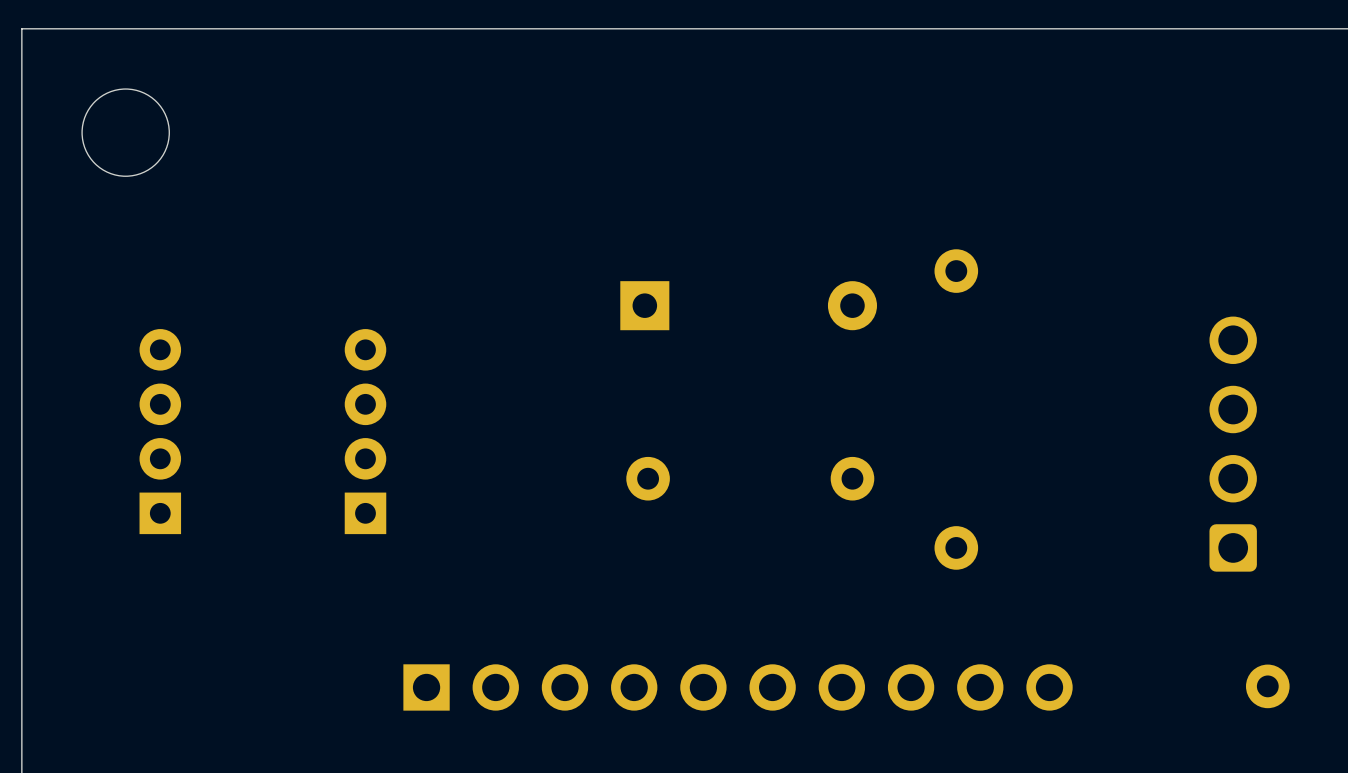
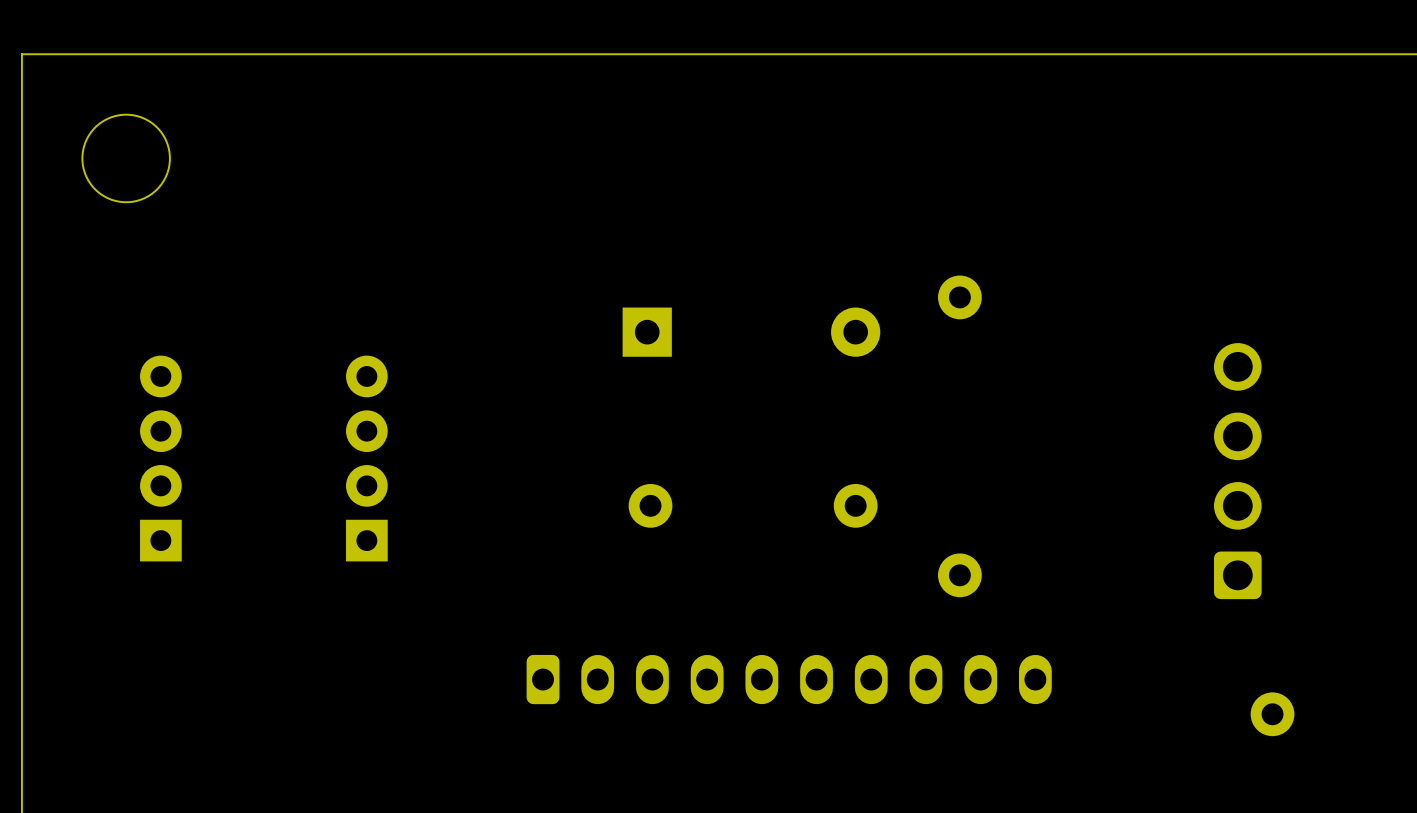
part: none -> (789, 679)
part: (738, 687) -> none

